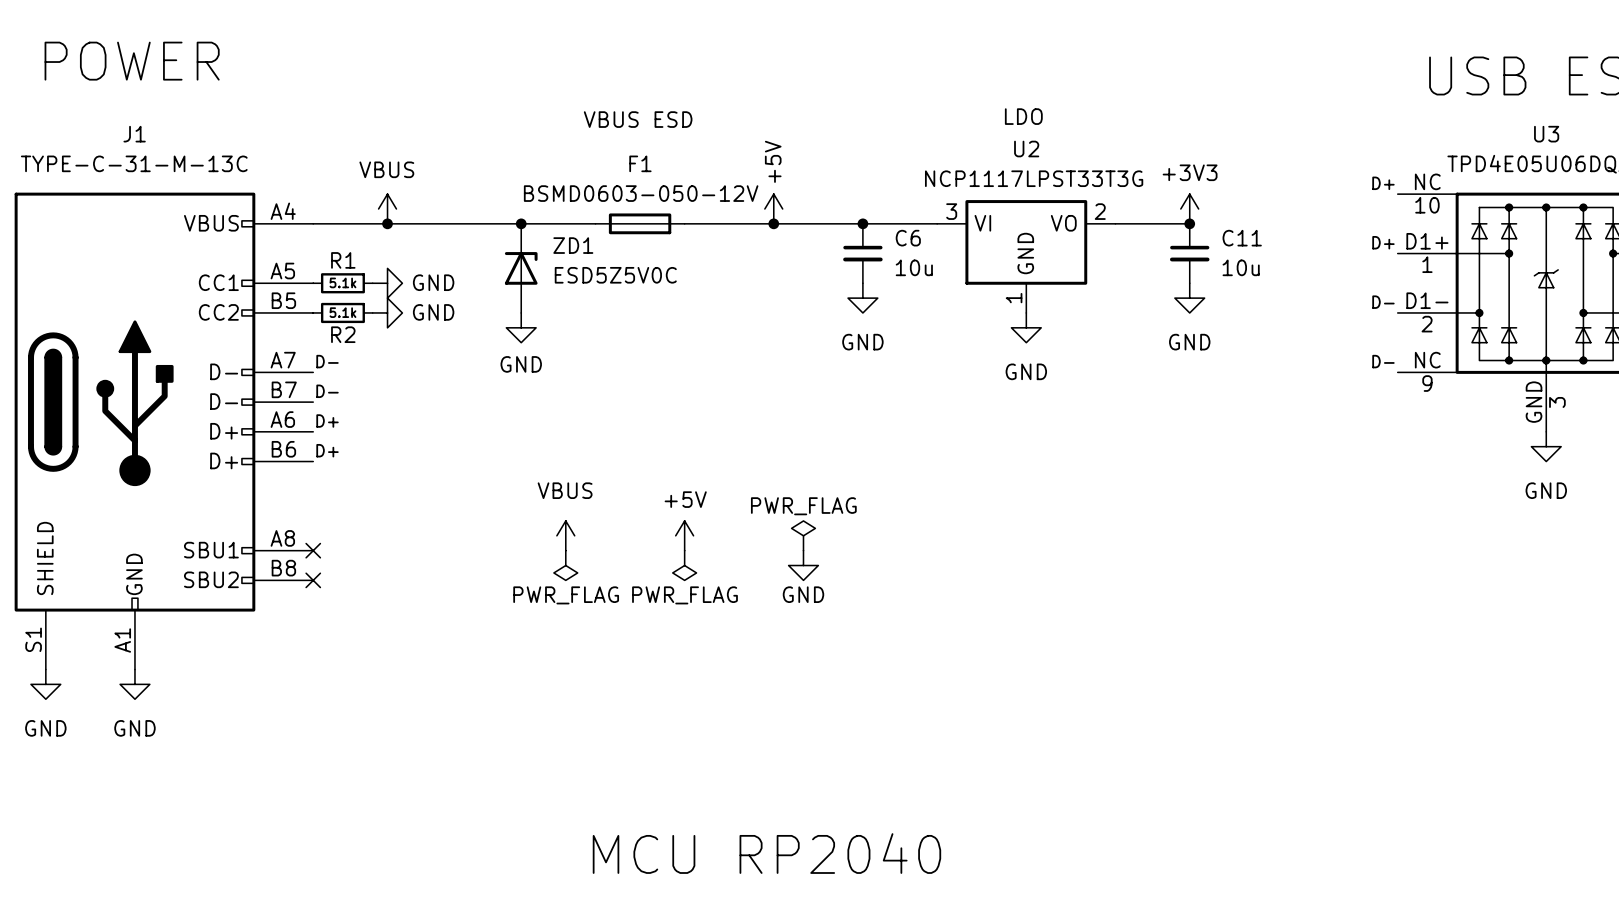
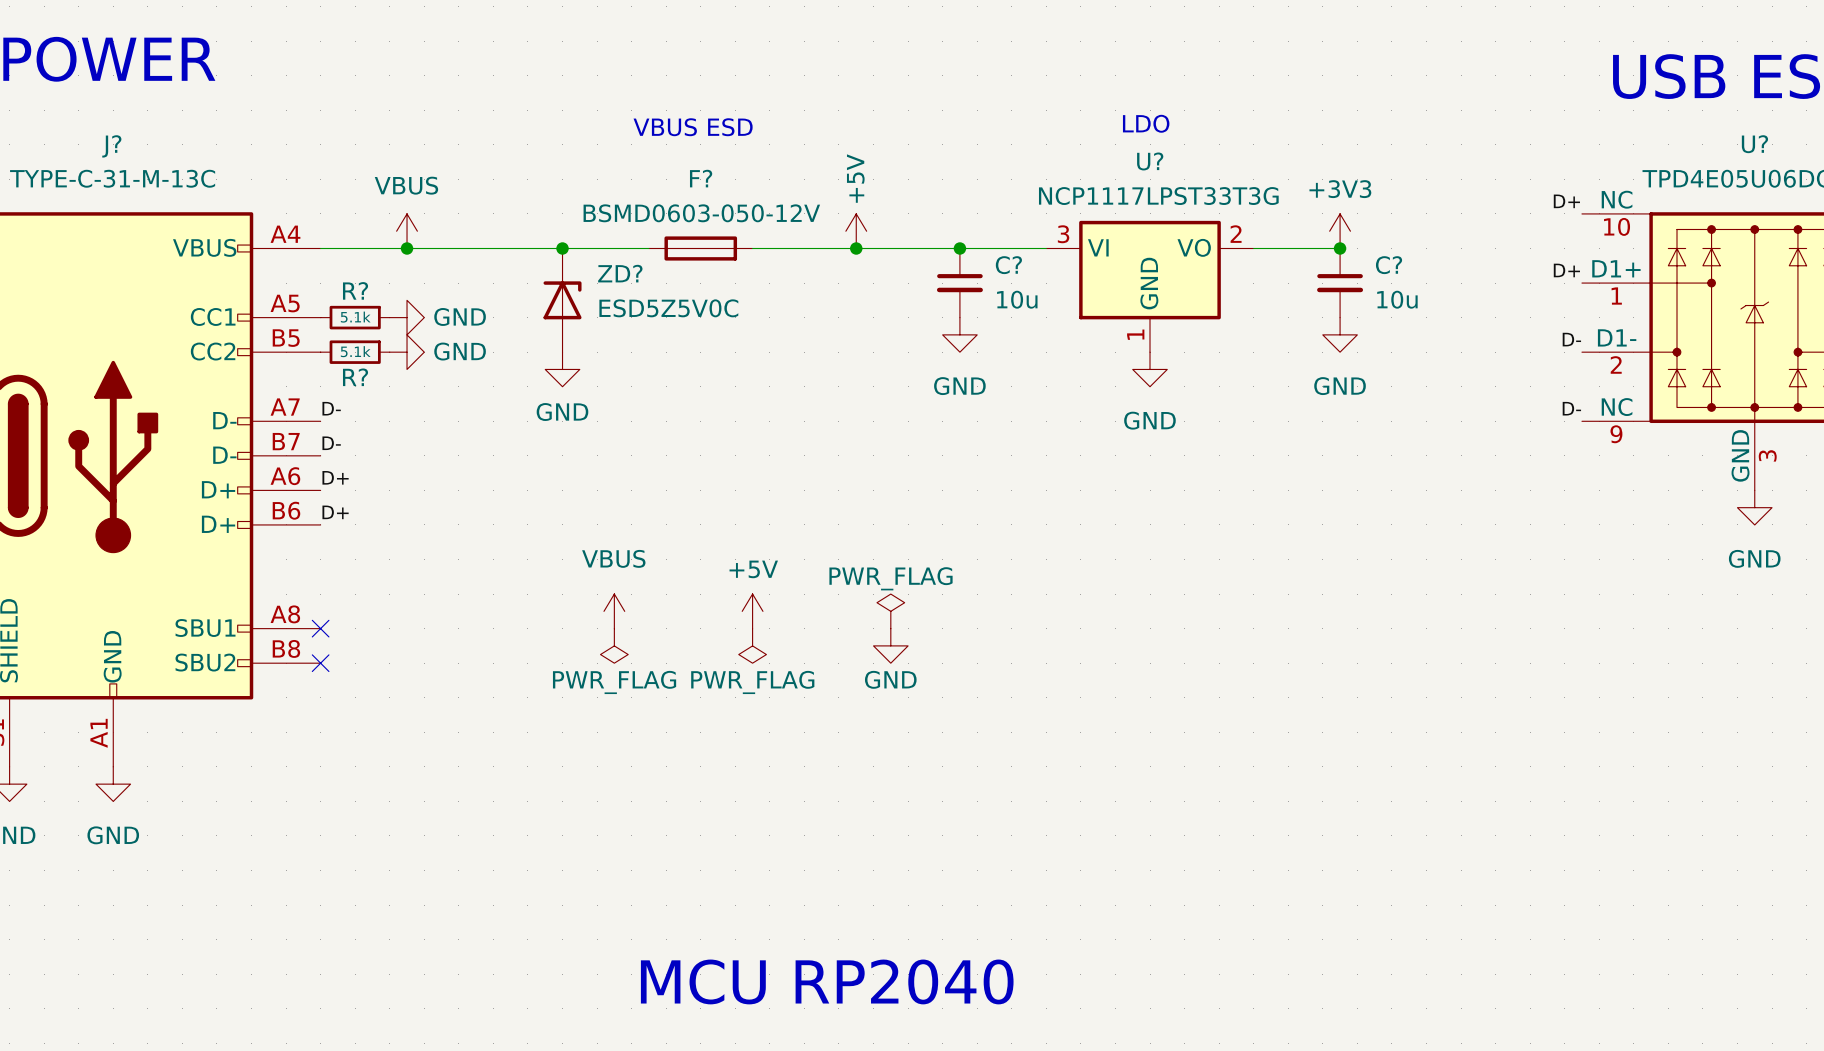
J1 name: J1 (134, 134) -> J? (111, 146)
U3 name: U3 (1546, 134) -> U? (1754, 144)
U2 name: U2 (1026, 149) -> U? (1150, 161)
F1 name: F1 (640, 163) -> F? (701, 178)
C6 name: C6 (908, 238) -> C? (1008, 265)
C11 name: C11 (1242, 238) -> C? (1389, 265)
ZD1 name: ZD1 (573, 245) -> ZD? (620, 273)
R1 name: R1 (343, 260) -> R? (355, 290)
R2 name: R2 (343, 334) -> R? (355, 377)

